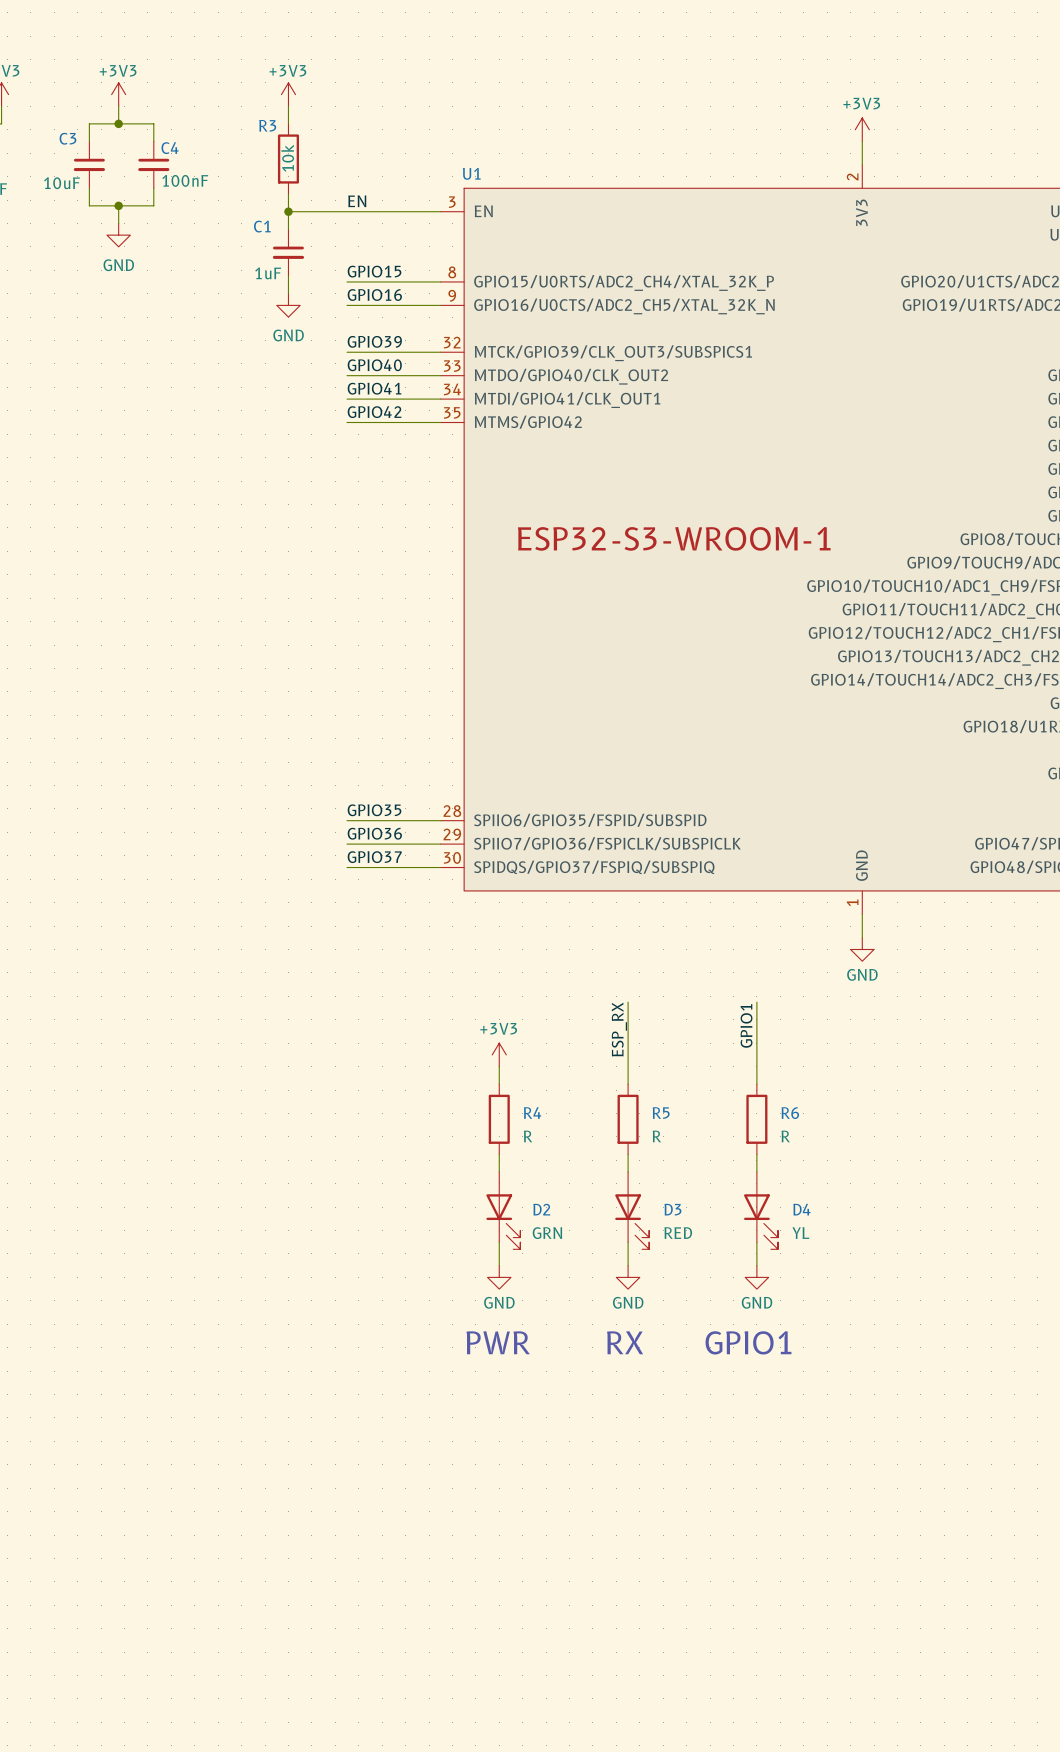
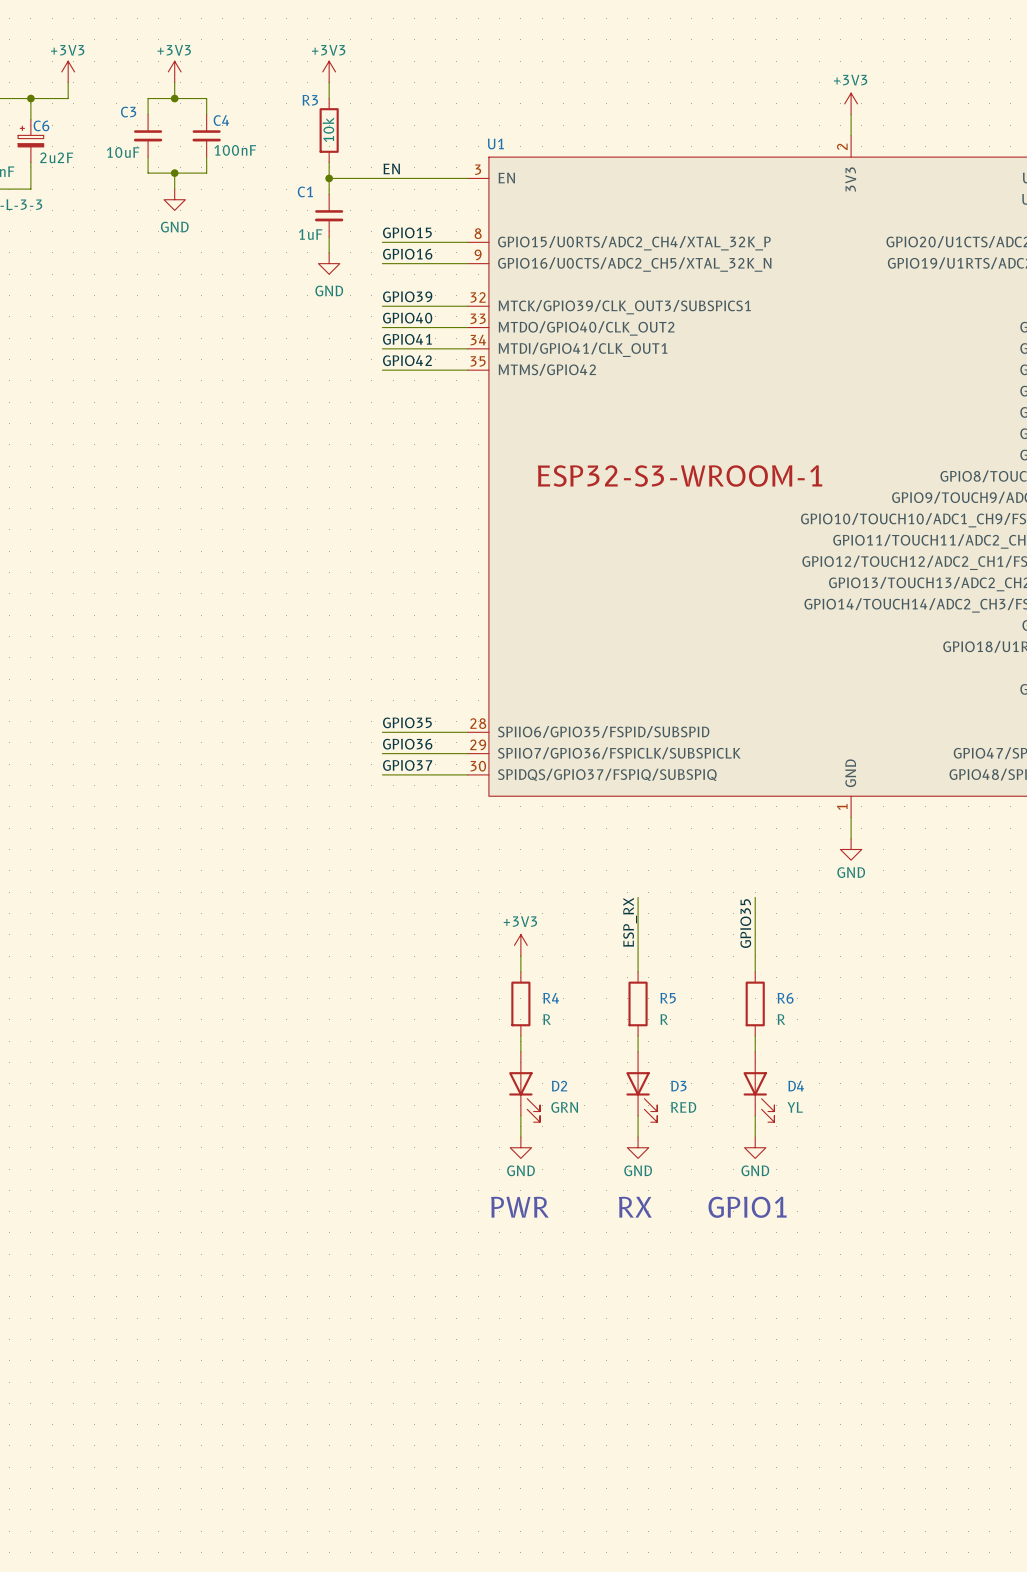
label: GPIO1 (746, 1025) -> GPIO35 (745, 923)

